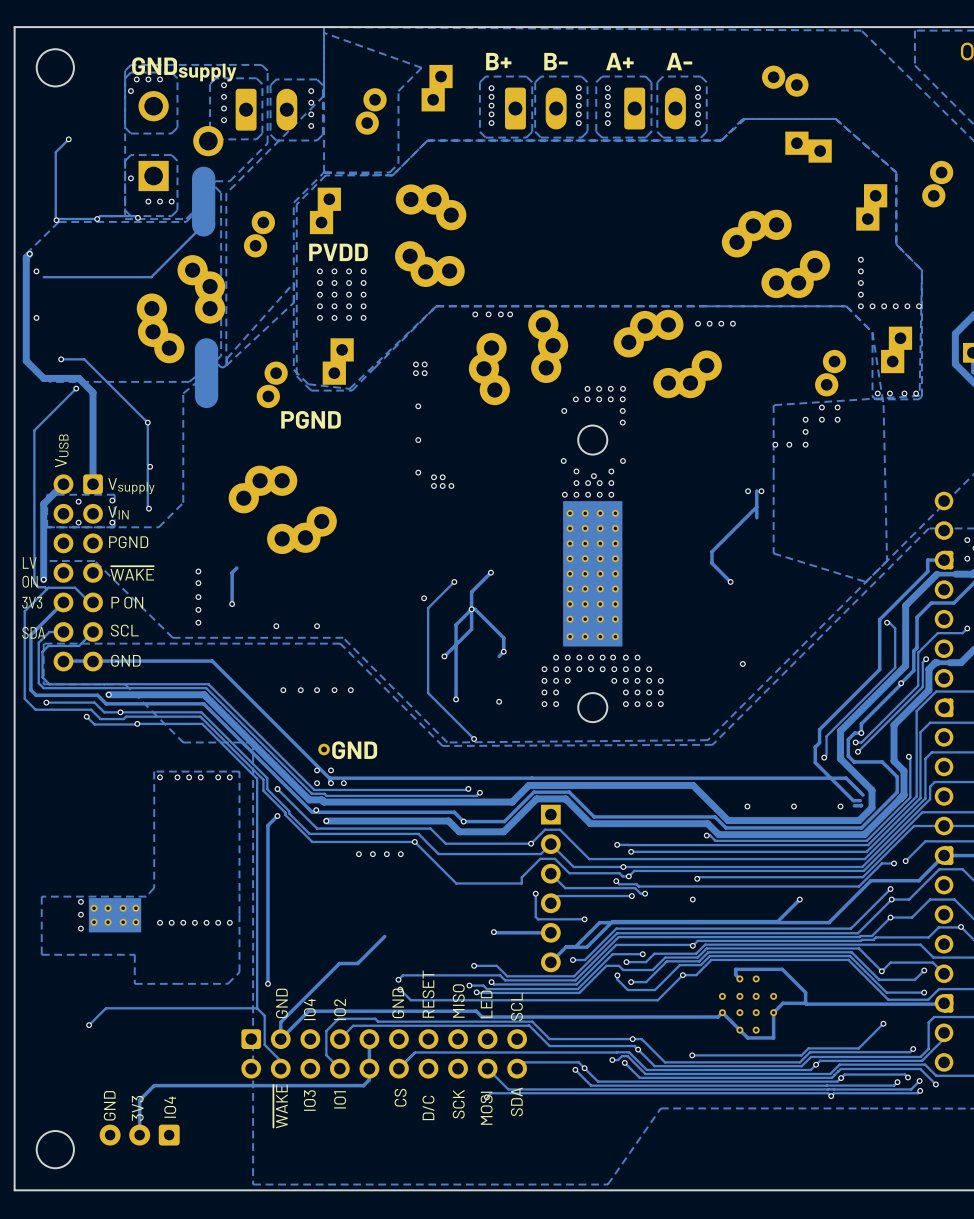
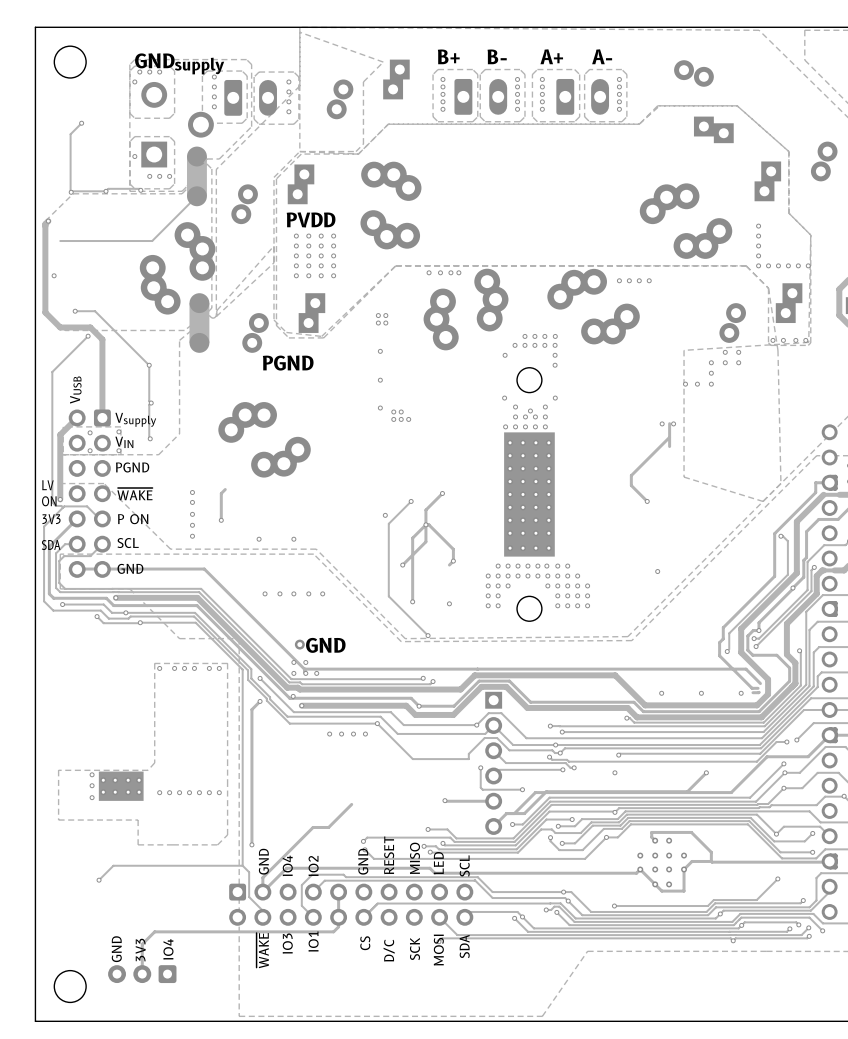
via: (36, 271) -> none

